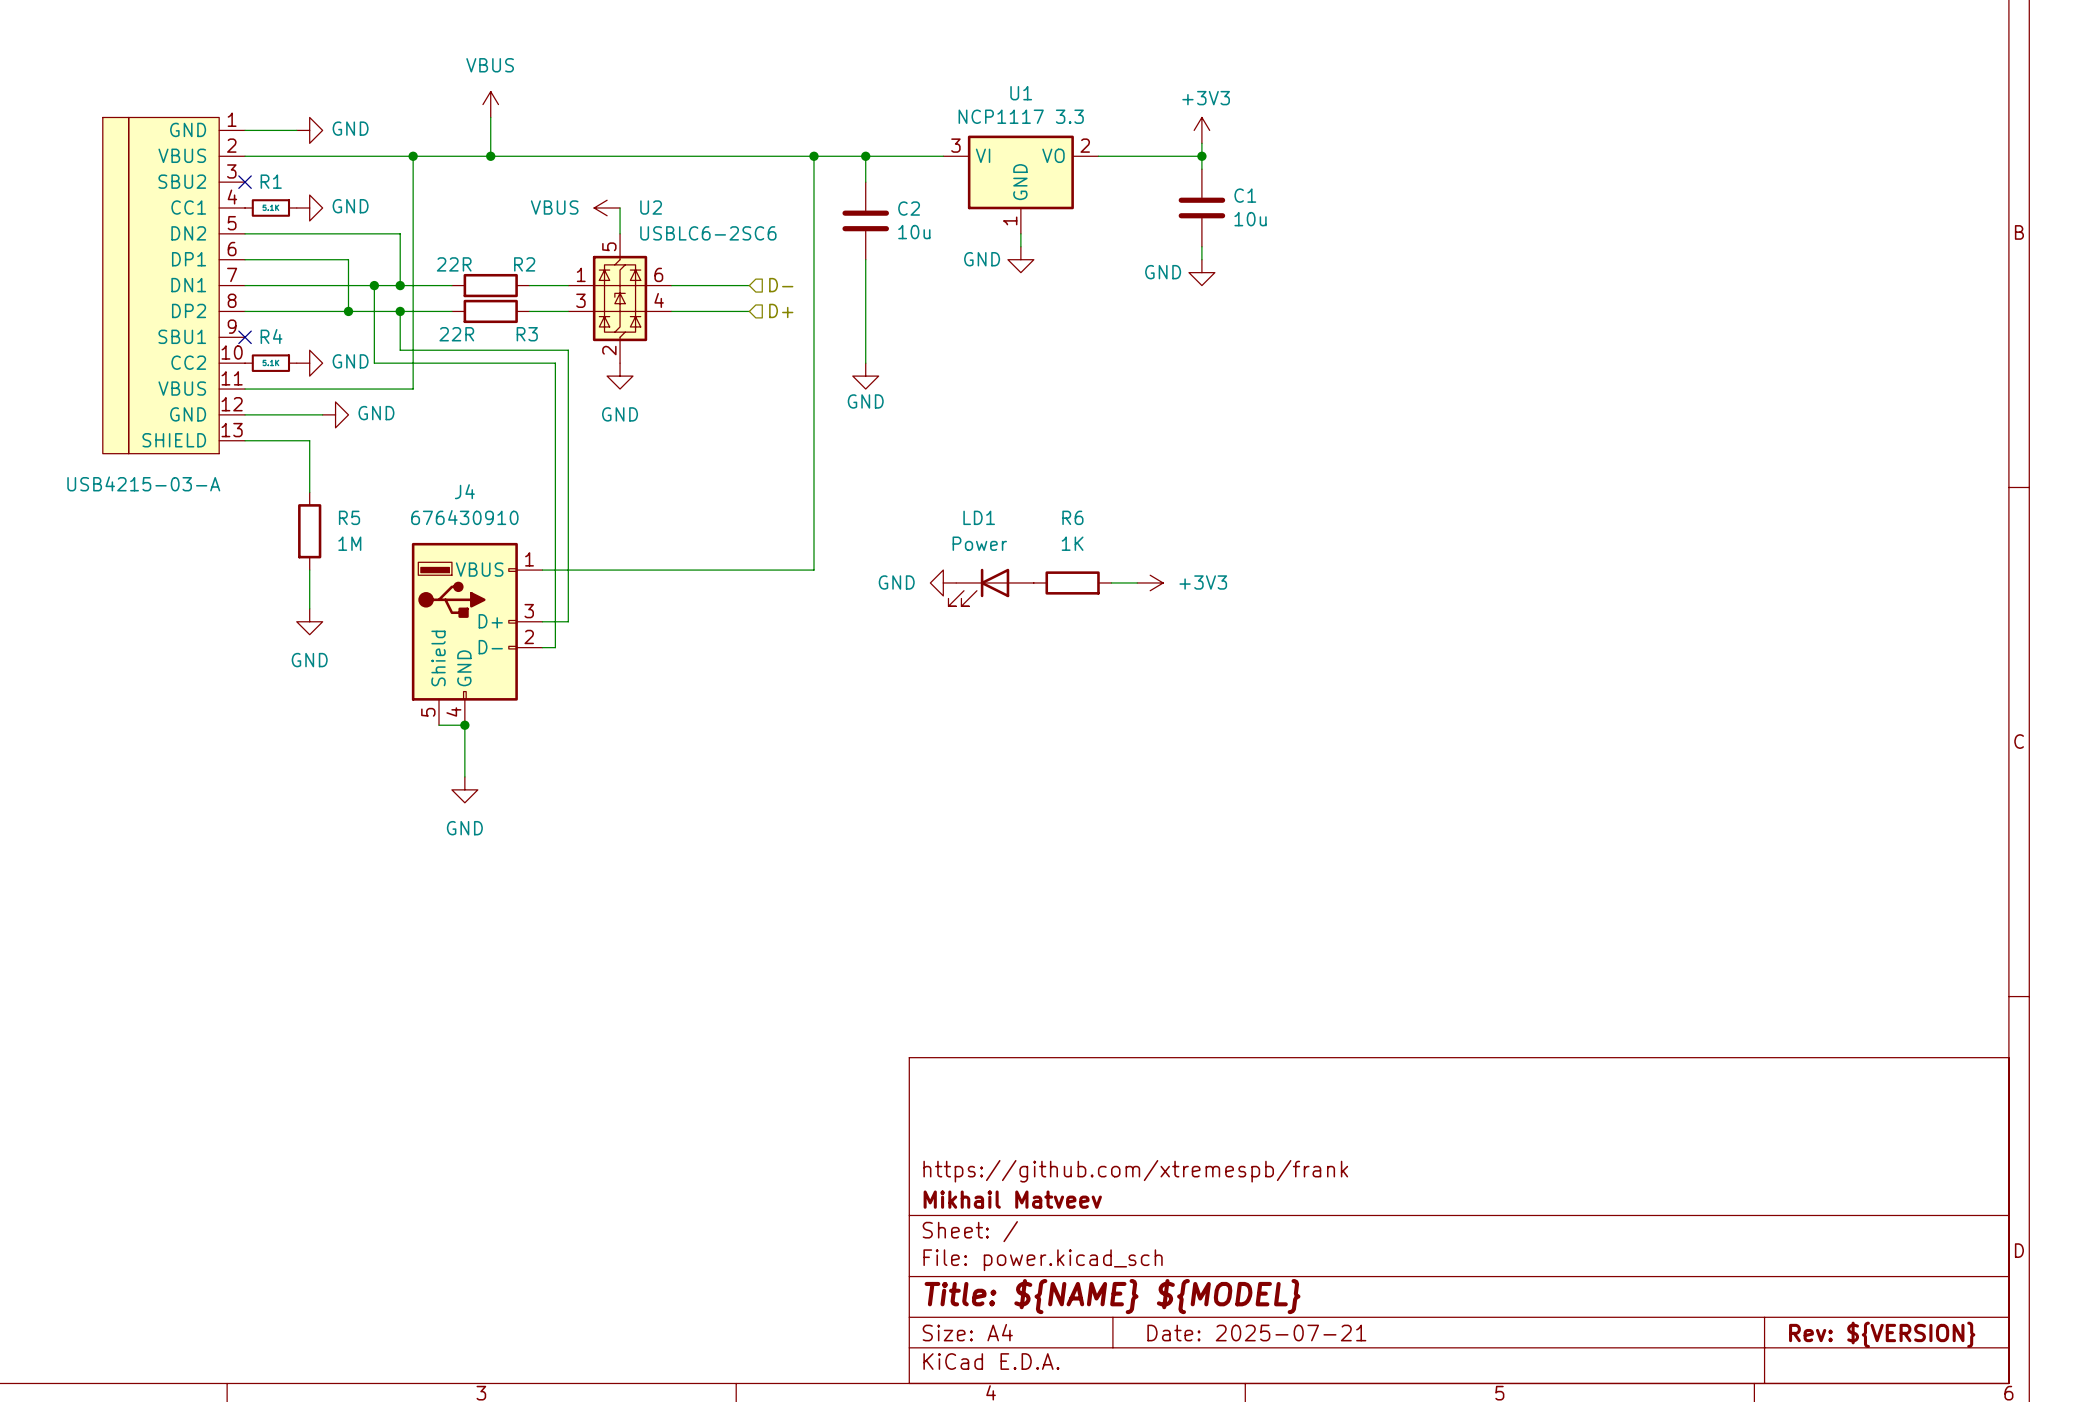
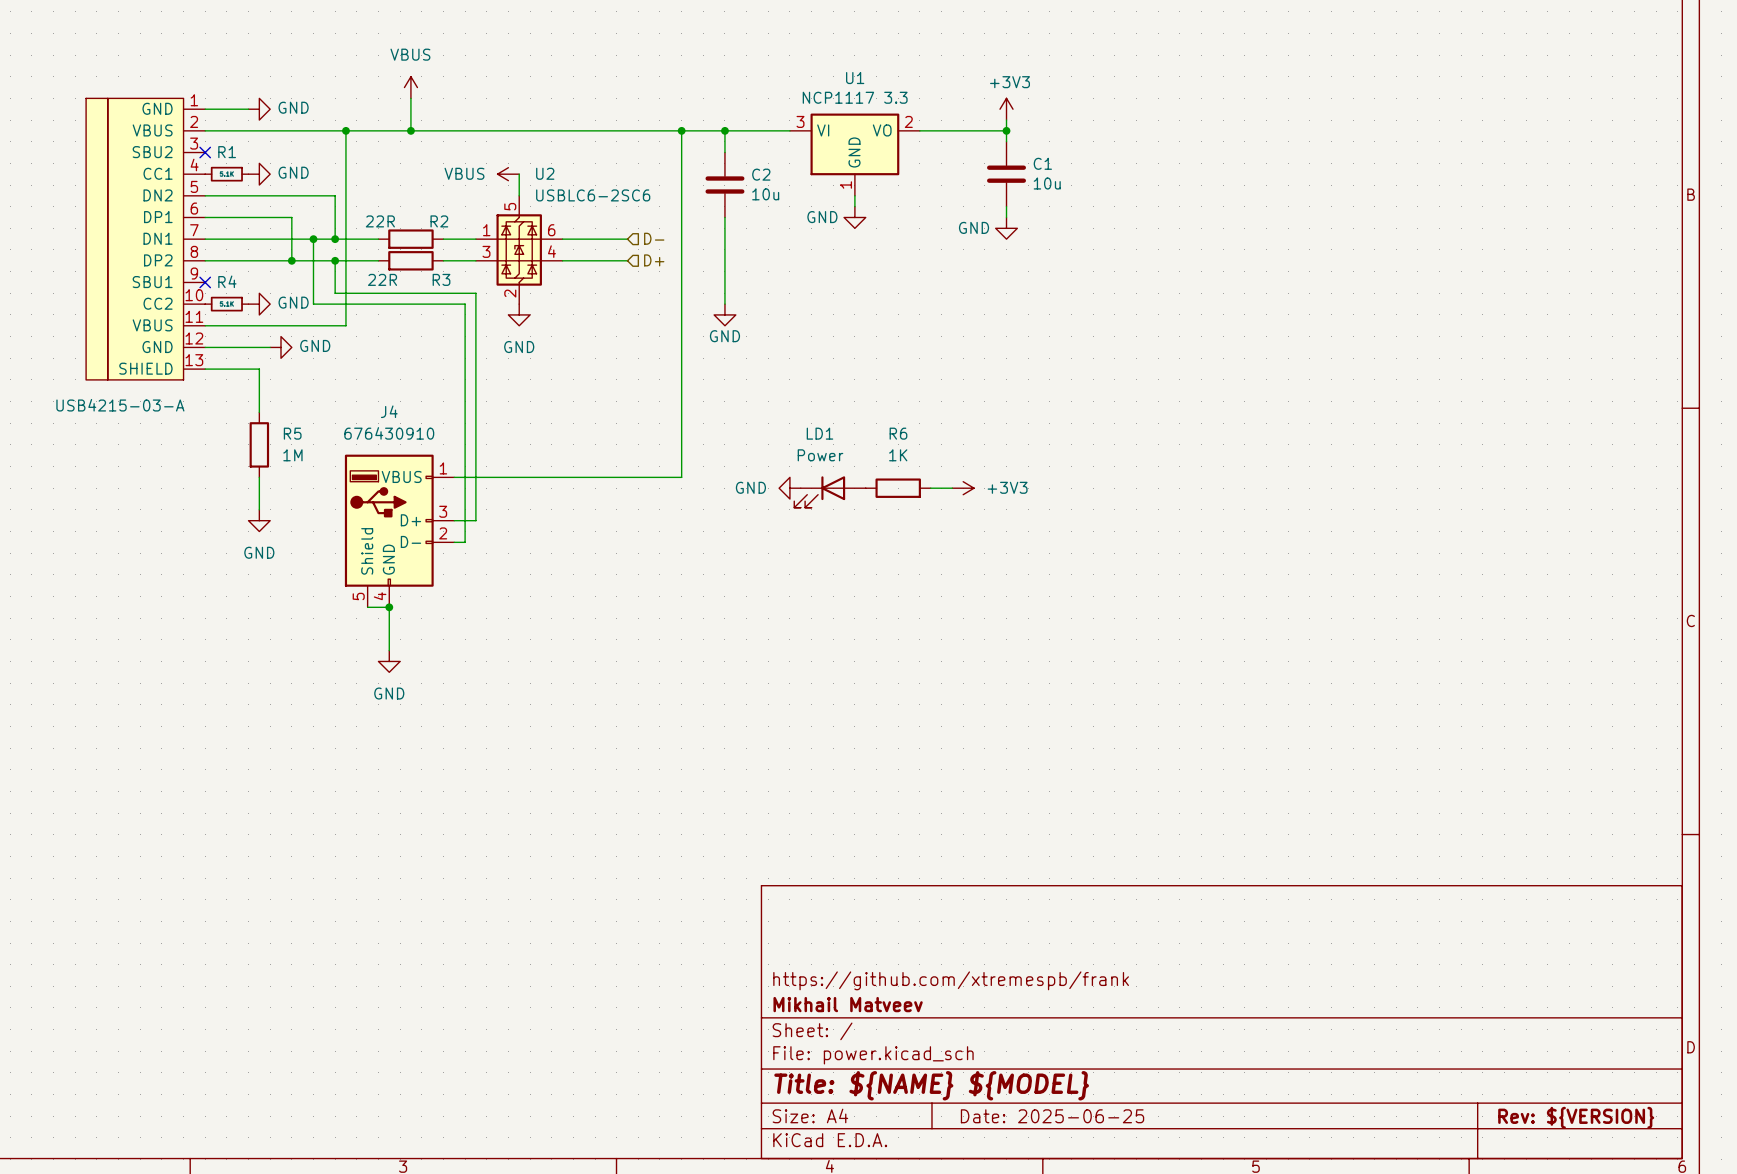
title block: Date: 2025-07-21 (1256, 1333) -> Date: 2025-06-25 (1052, 1116)

